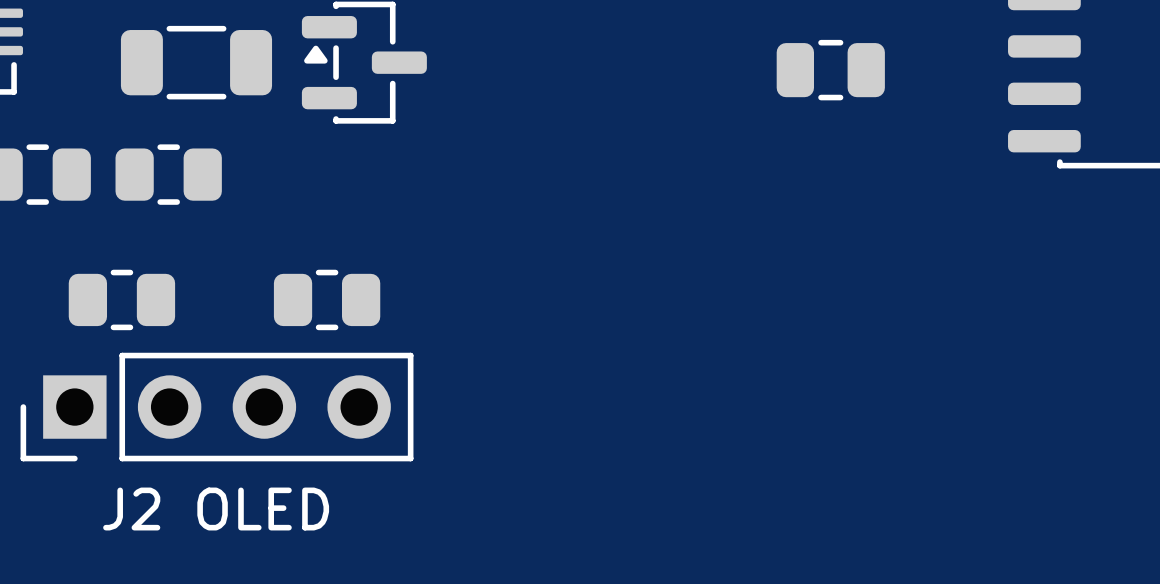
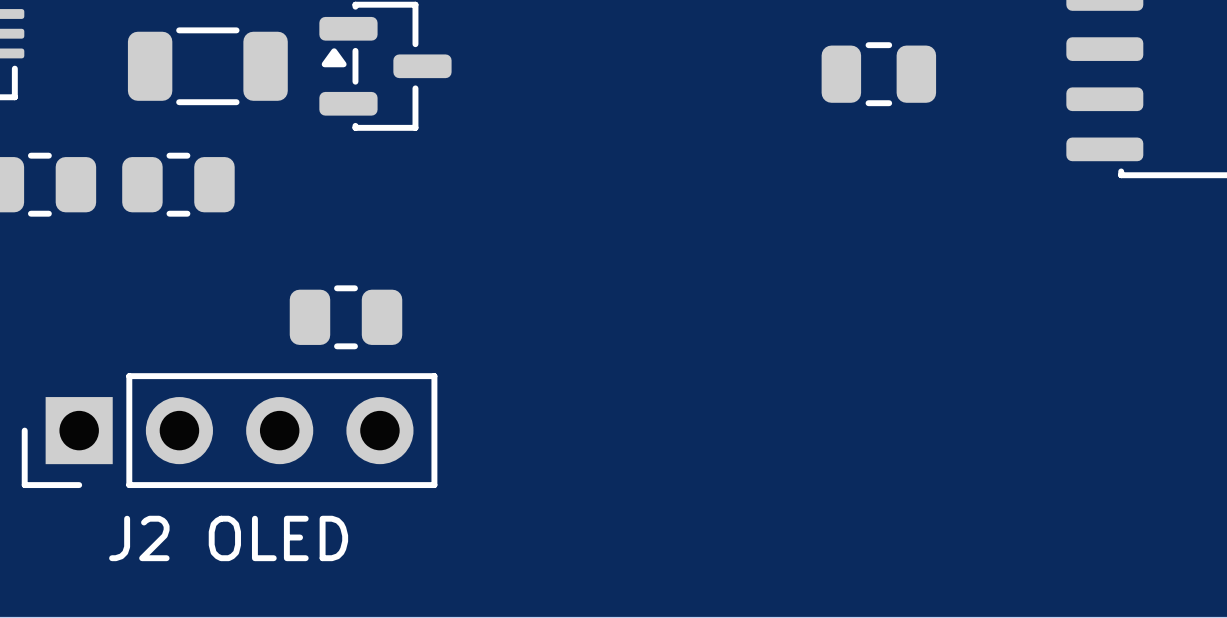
part: (121, 299) -> none

